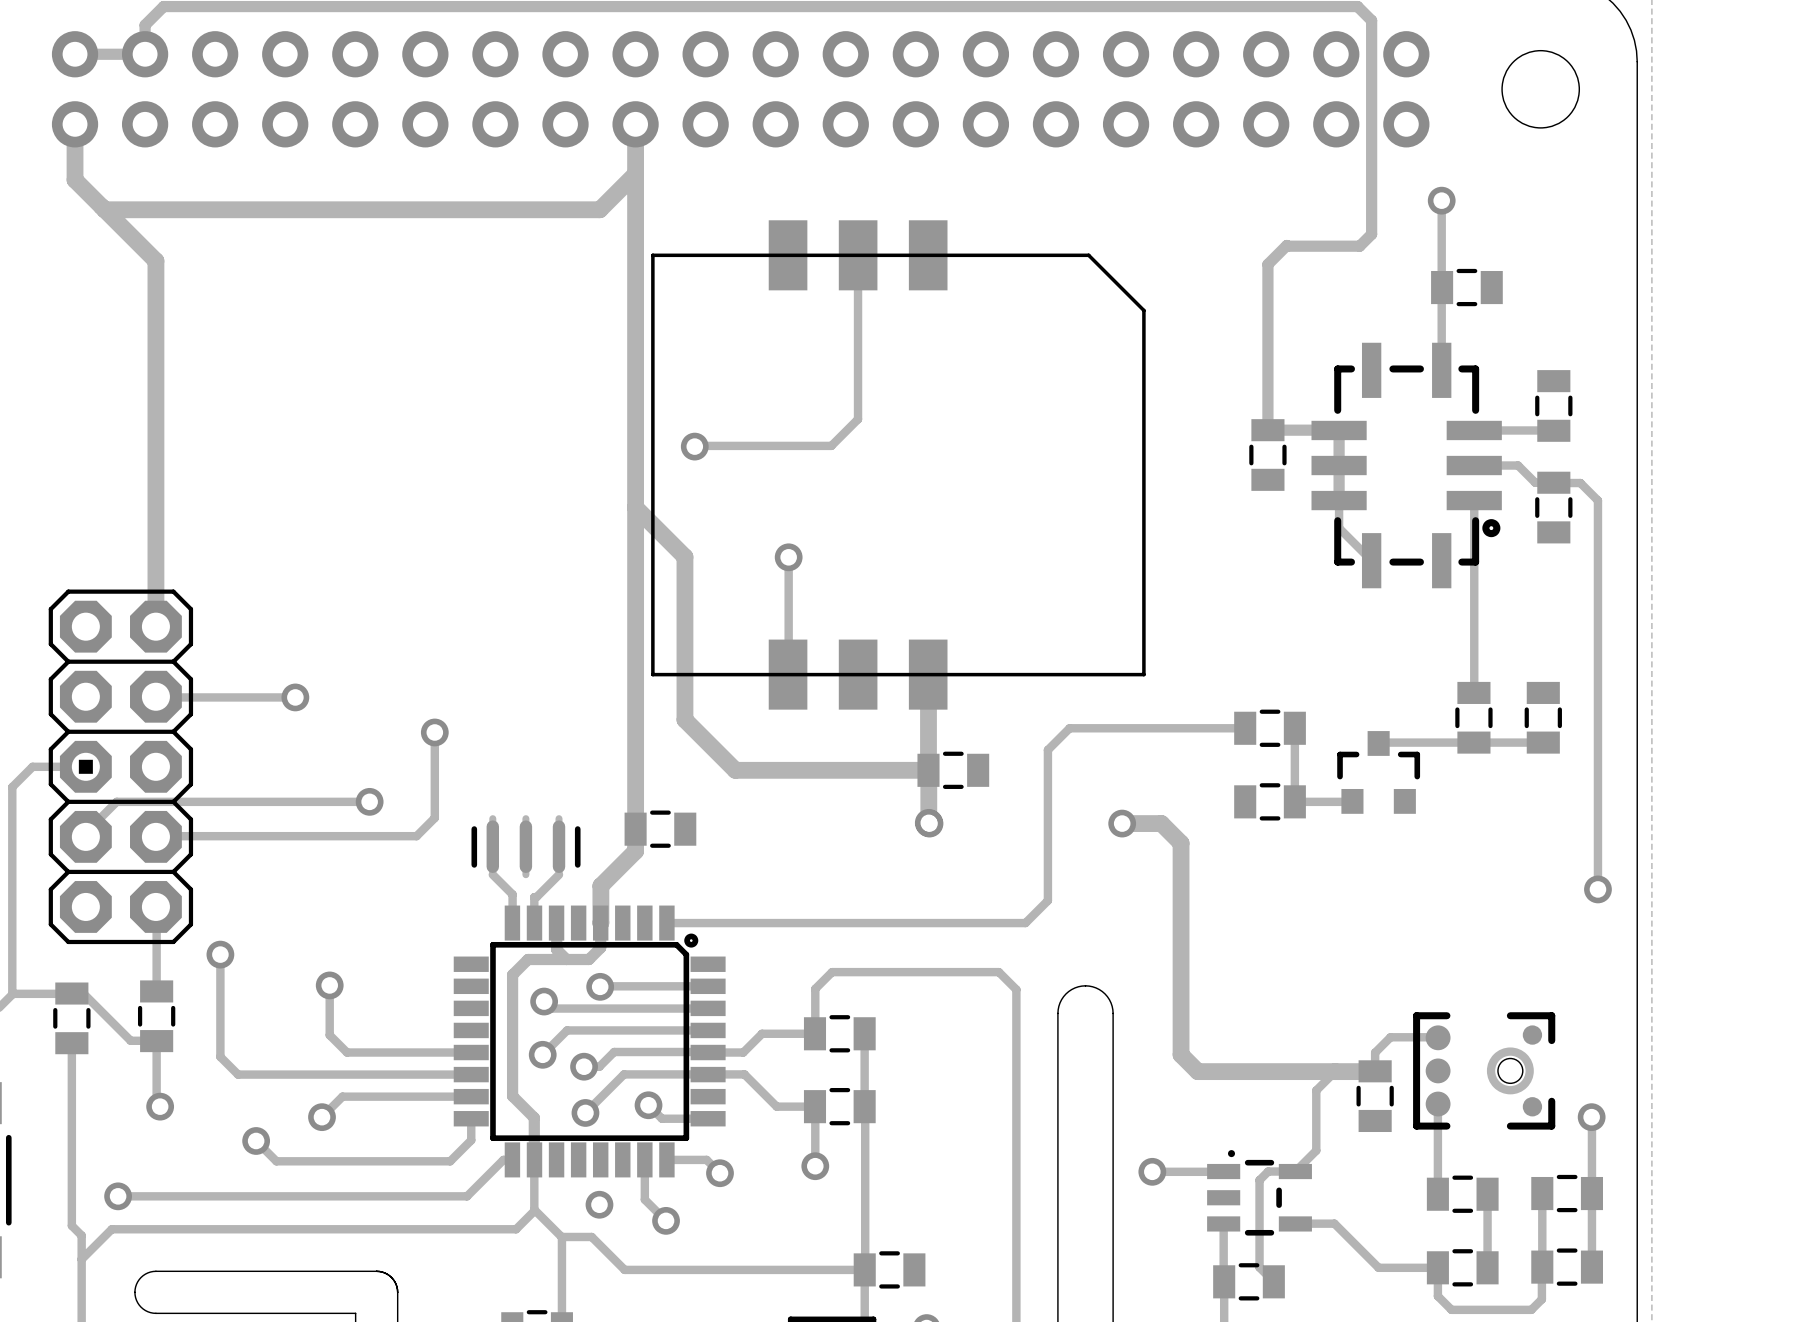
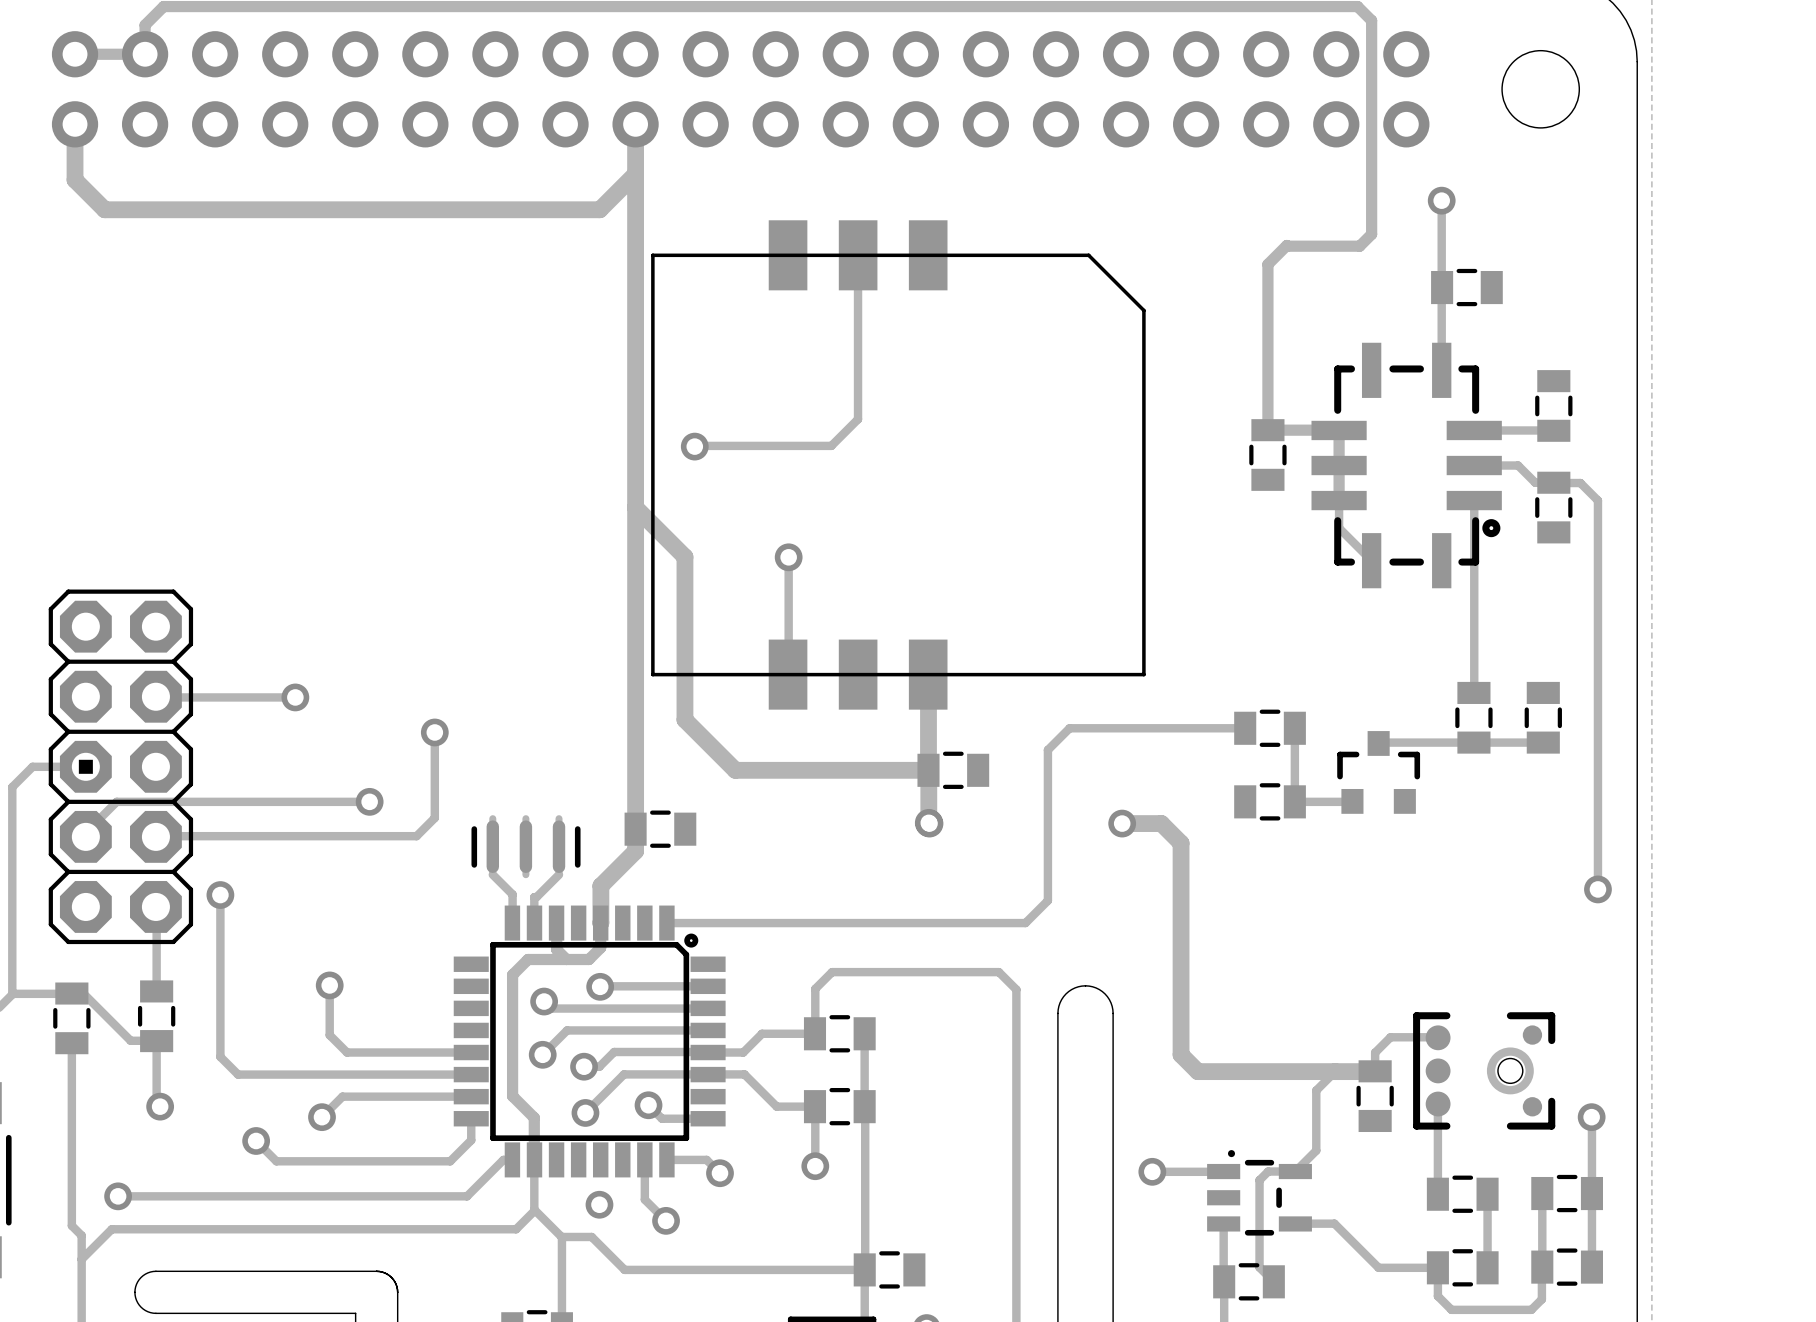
track: (104, 209) (155, 260) (155, 626) -> none
track: none -> (220, 895) (220, 954)
via position: (220, 954) -> (220, 895)

